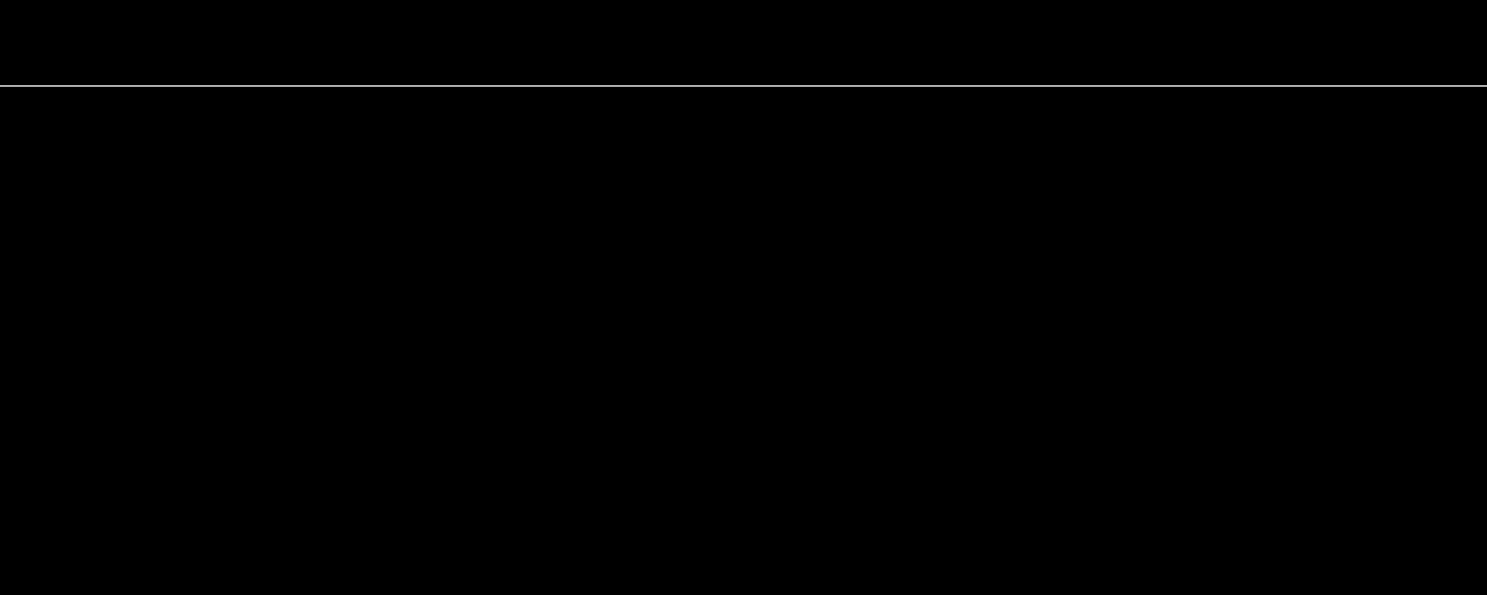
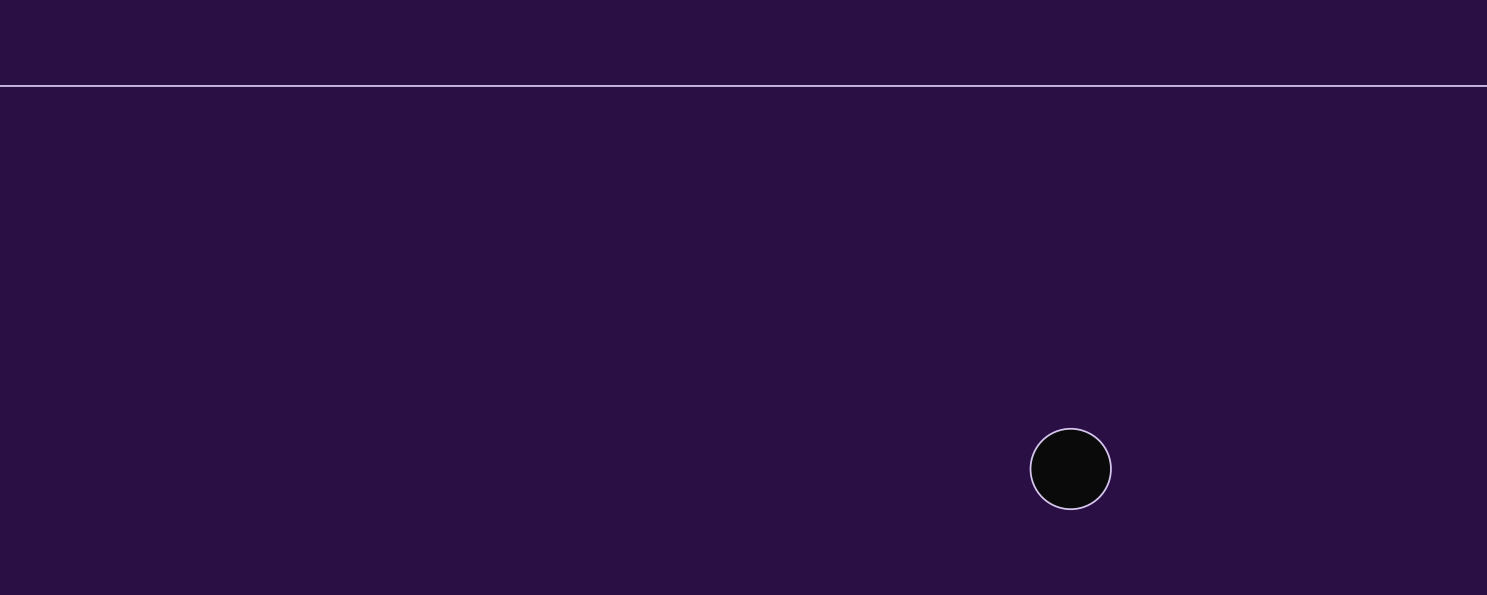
part: none -> (1070, 468)

